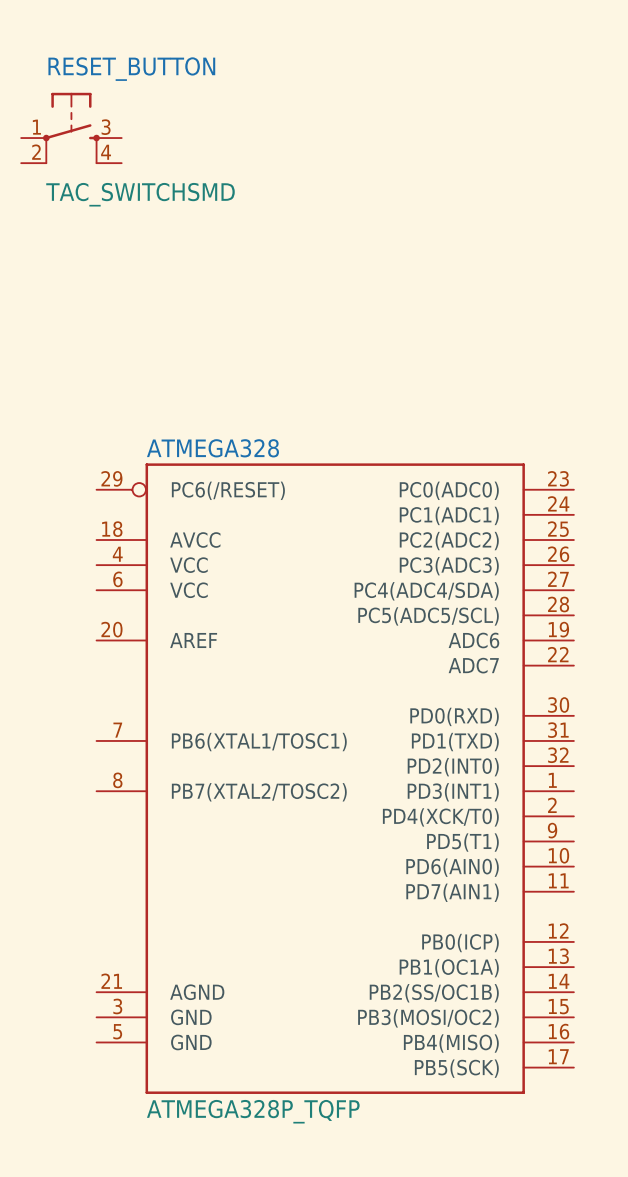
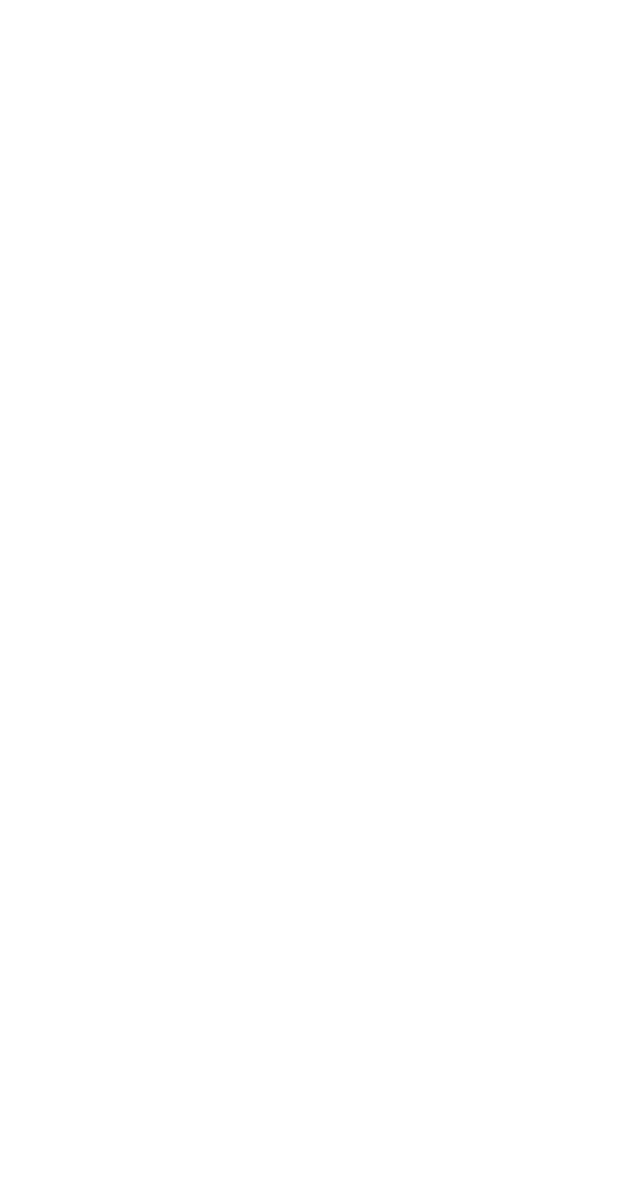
RESET_BUTTON: TAC_SWITCHSMD (71, 128) -> none
ATMEGA328: ATMEGA328P_TQFP (335, 778) -> none

